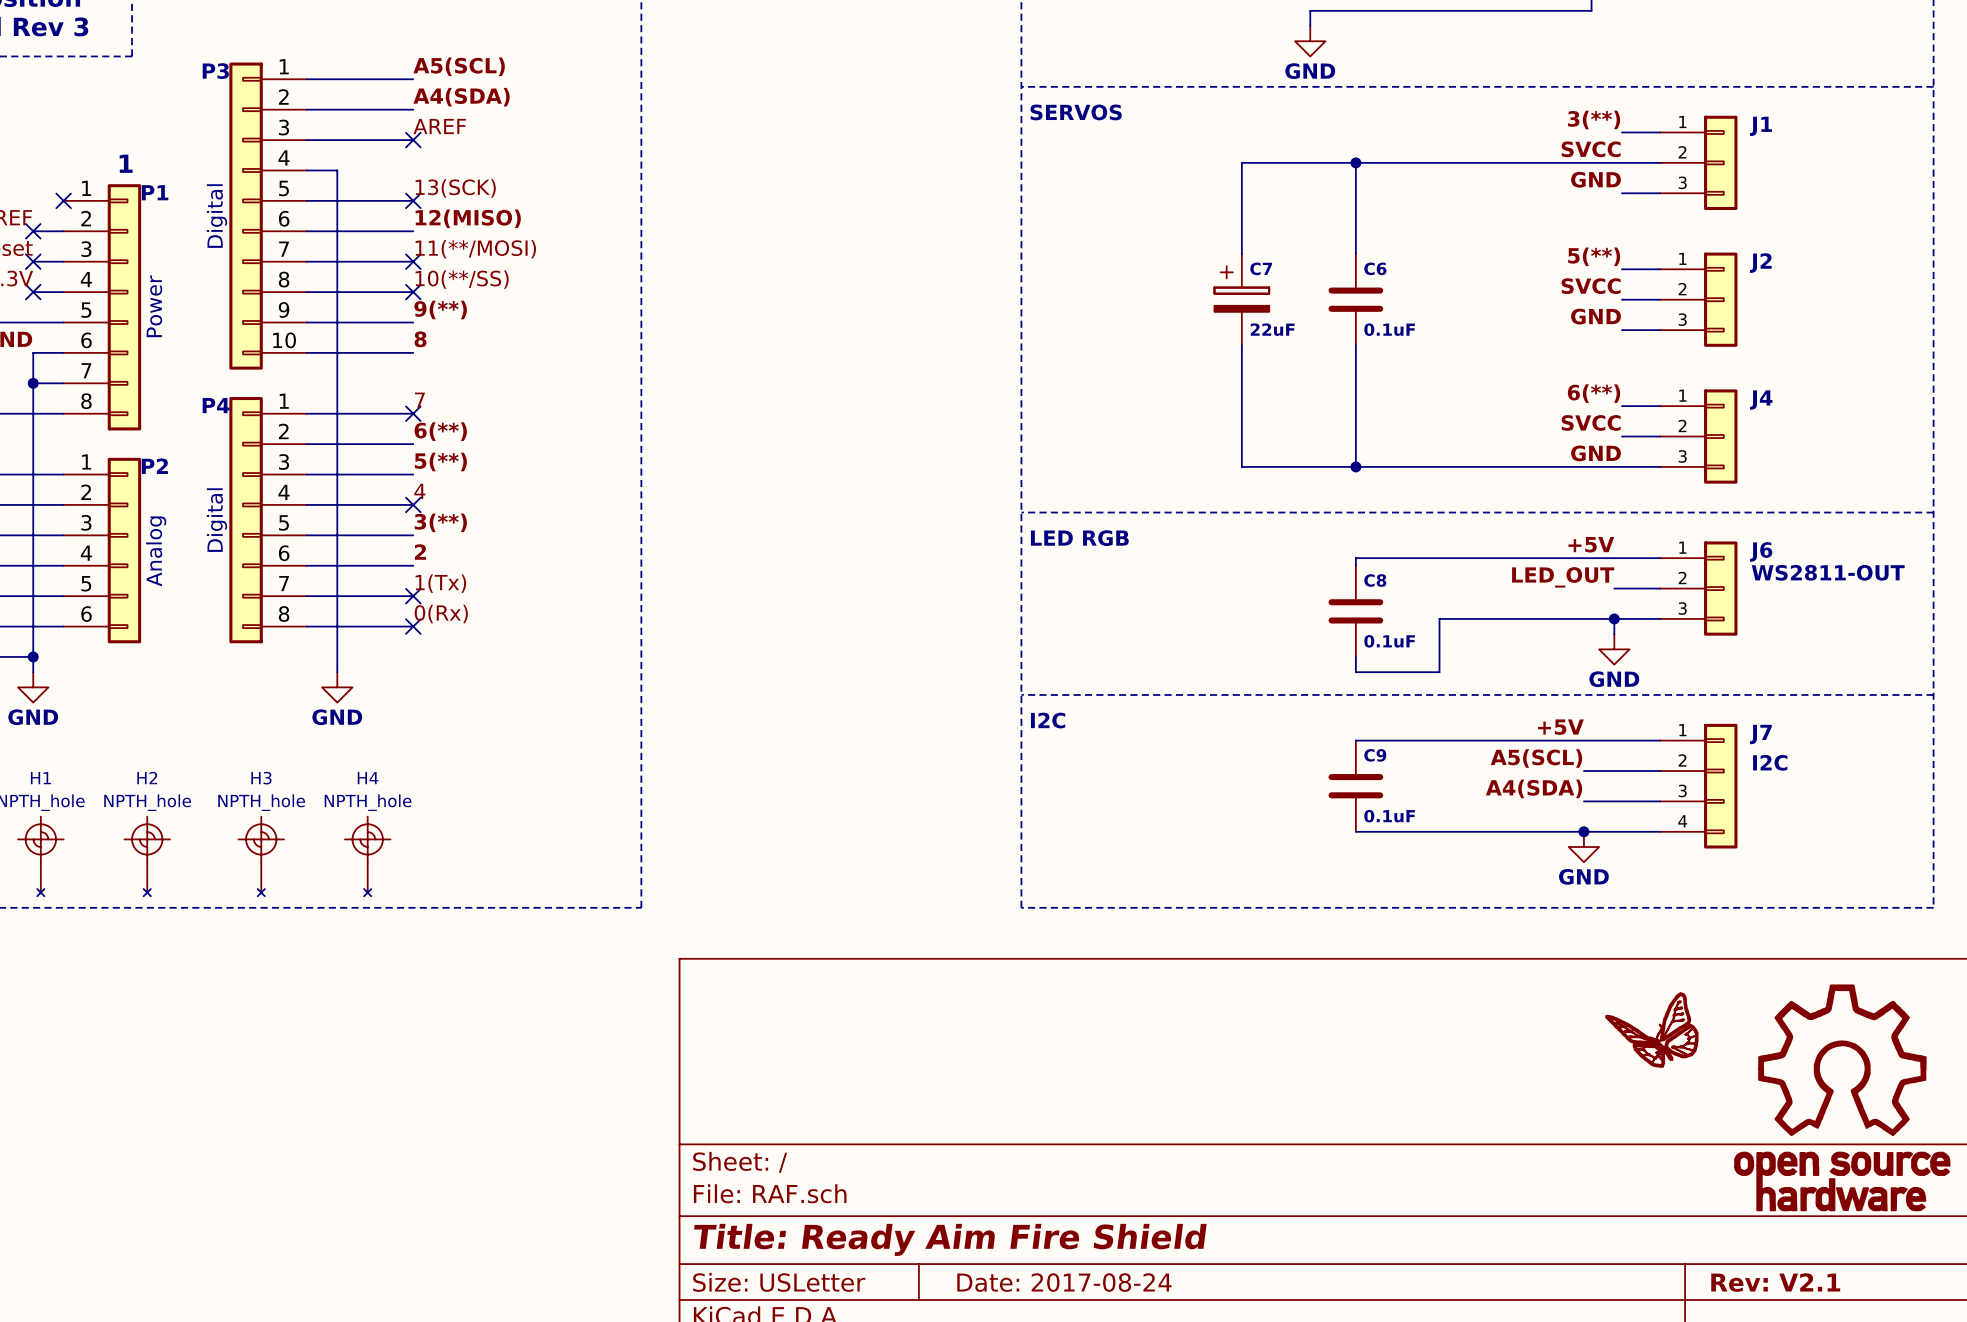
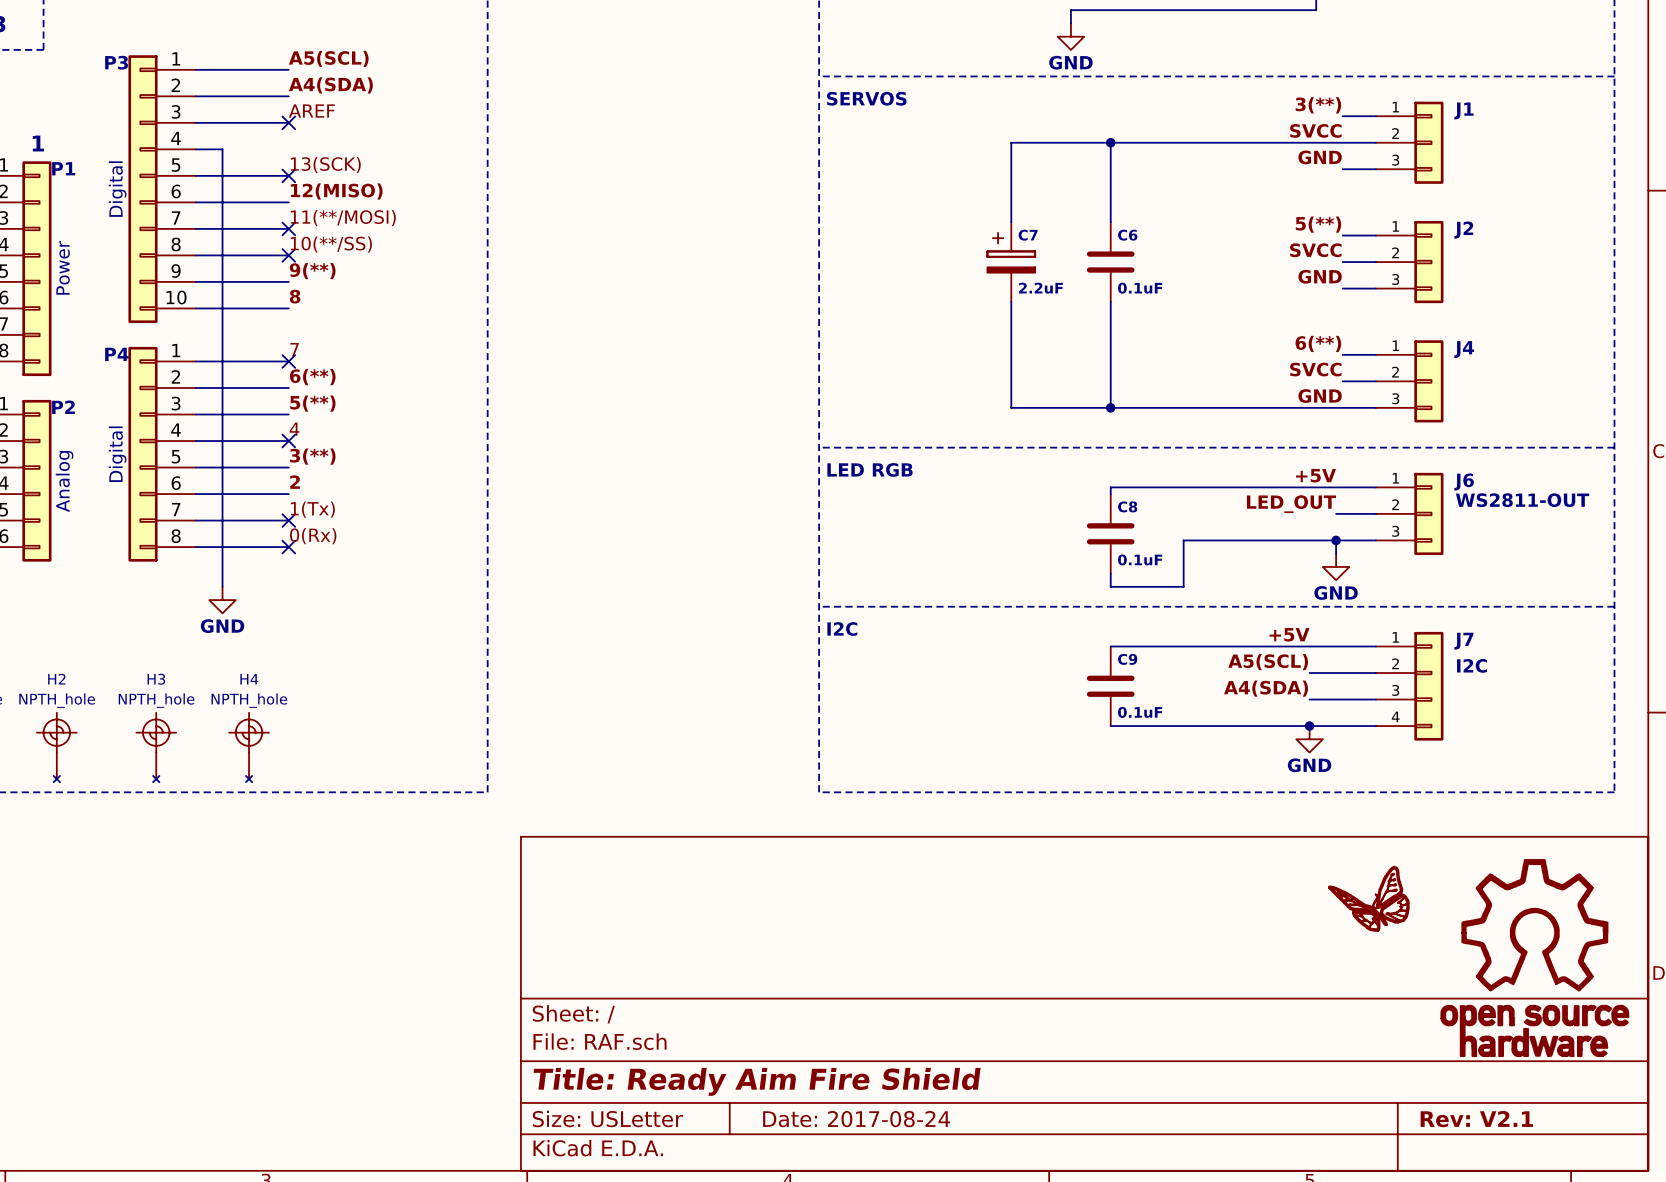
C7 value: 22uF (1272, 329) -> 2.2uF (1040, 288)

